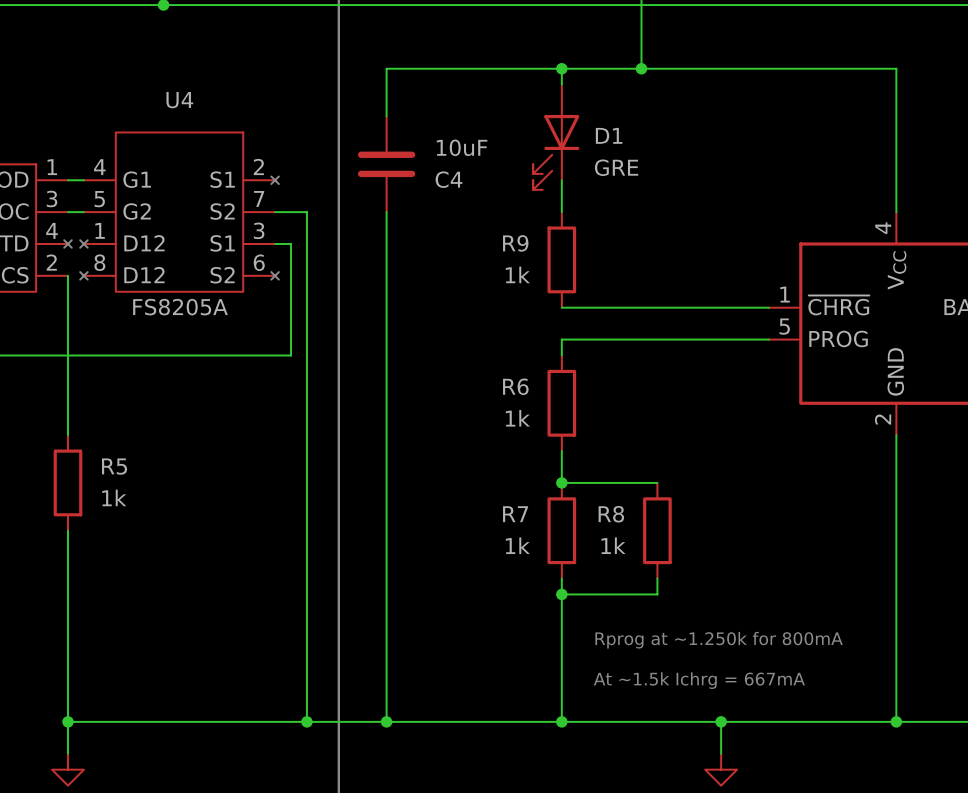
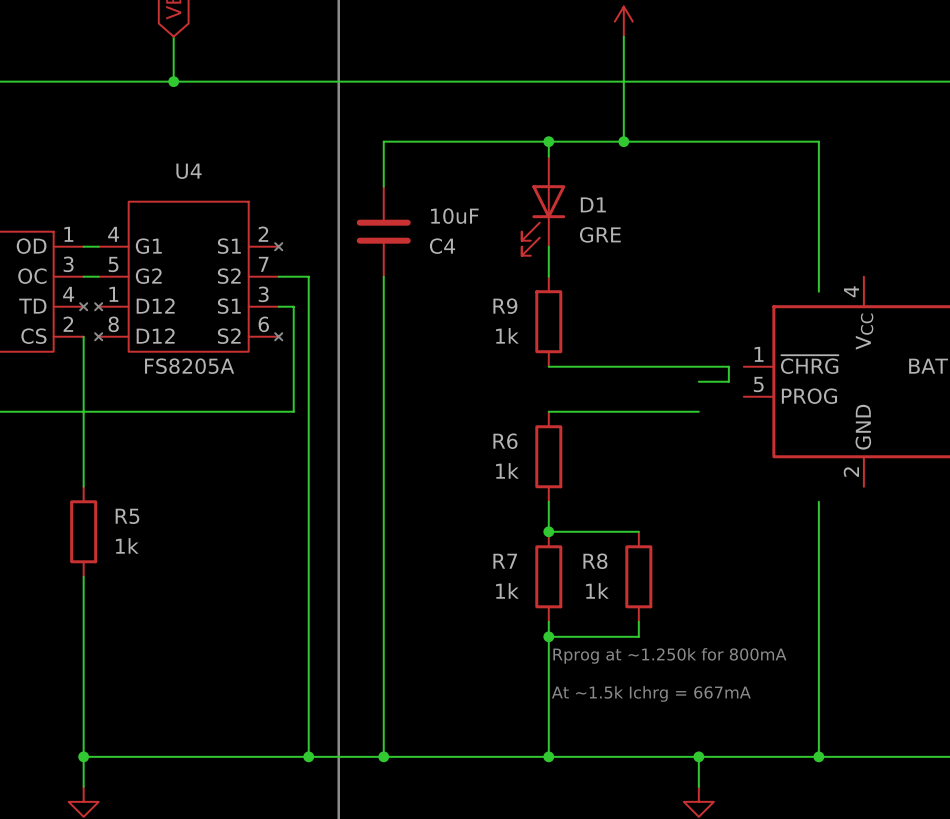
wire: (848, 68) (896, 68) (896, 212) -> (818, 141) (818, 291)
wire: (752, 307) (768, 307) -> (728, 366) (728, 381) (698, 381)
wire: (768, 339) (561, 339) (561, 355) -> (698, 411) (548, 411)
wire: (896, 435) (896, 721) -> none
wire: none -> (818, 501) (818, 756)
text position: Rprog at ~1.250k for 800mA (719, 640) -> Rprog at ~1.250k for 800mA (669, 655)
text position: At ~1.5k Ichrg = 667mA (699, 680) -> At ~1.5k Ichrg = 667mA (651, 693)
junction position: (896, 721) -> (818, 756)

